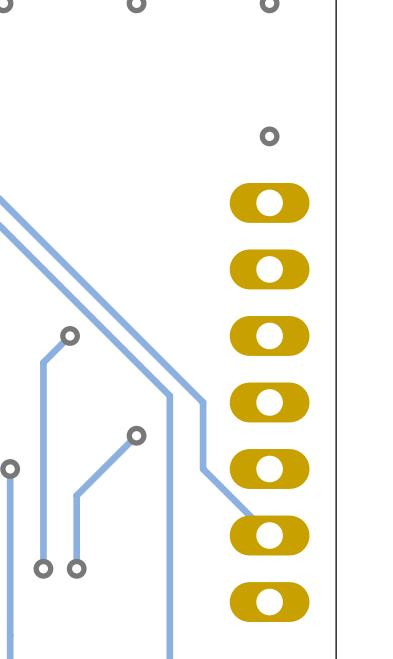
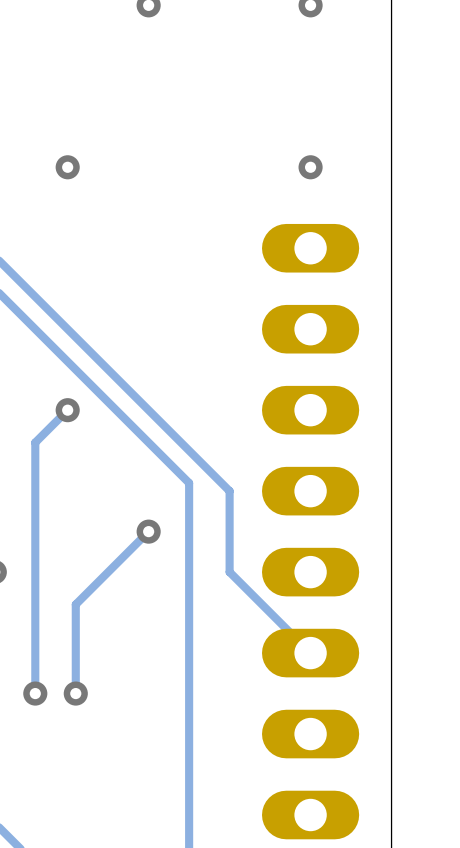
via: none -> (67, 167)

